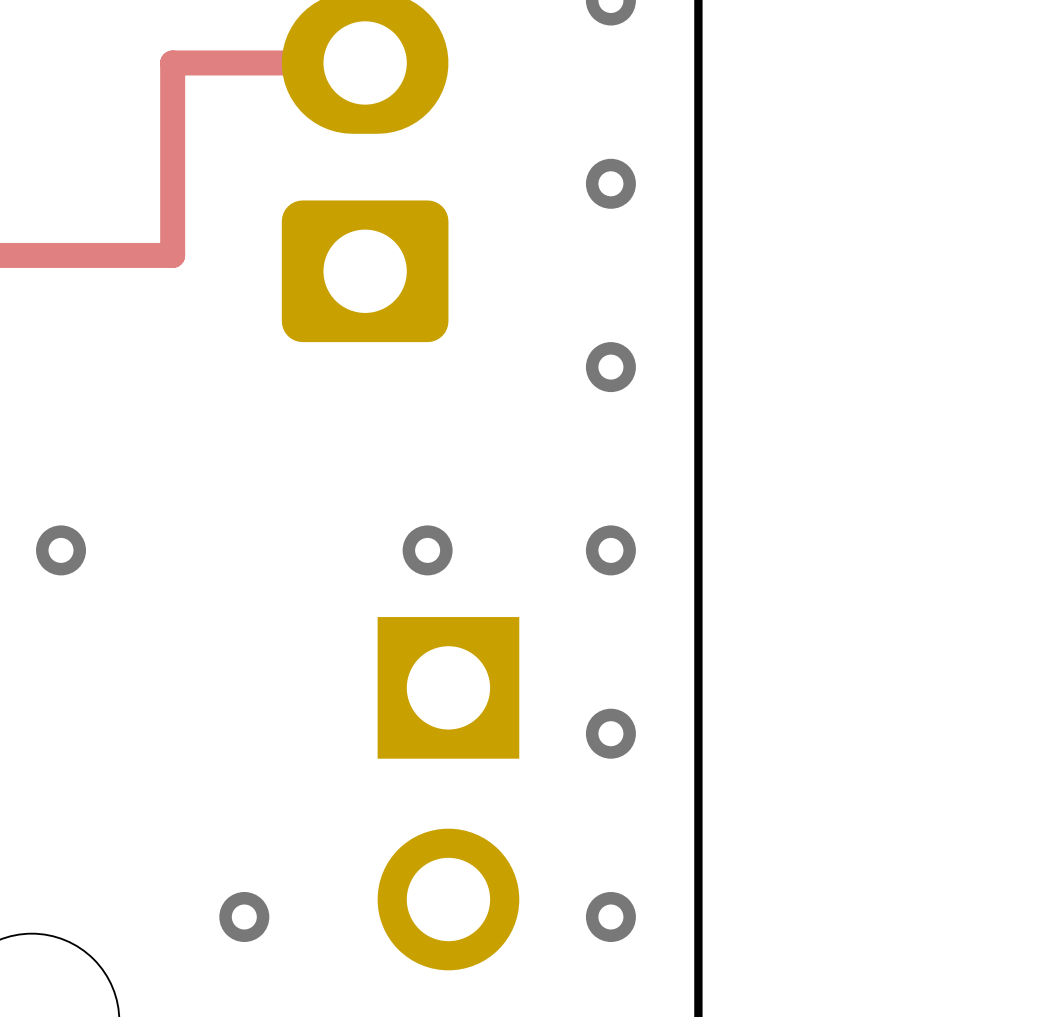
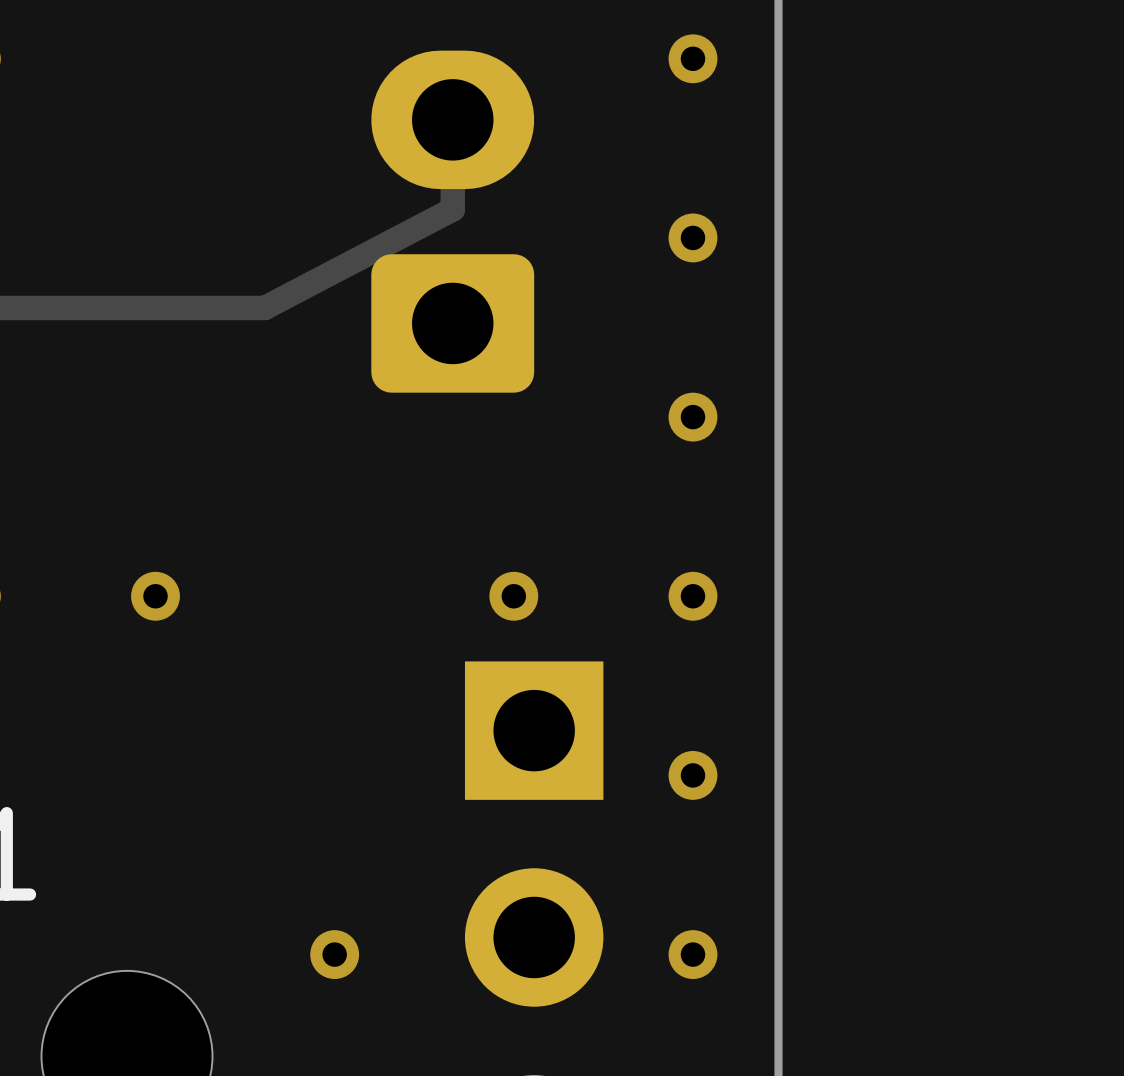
track: (365, 62) (172, 62) (172, 255) -> (452, 119) (452, 209) (264, 307)

